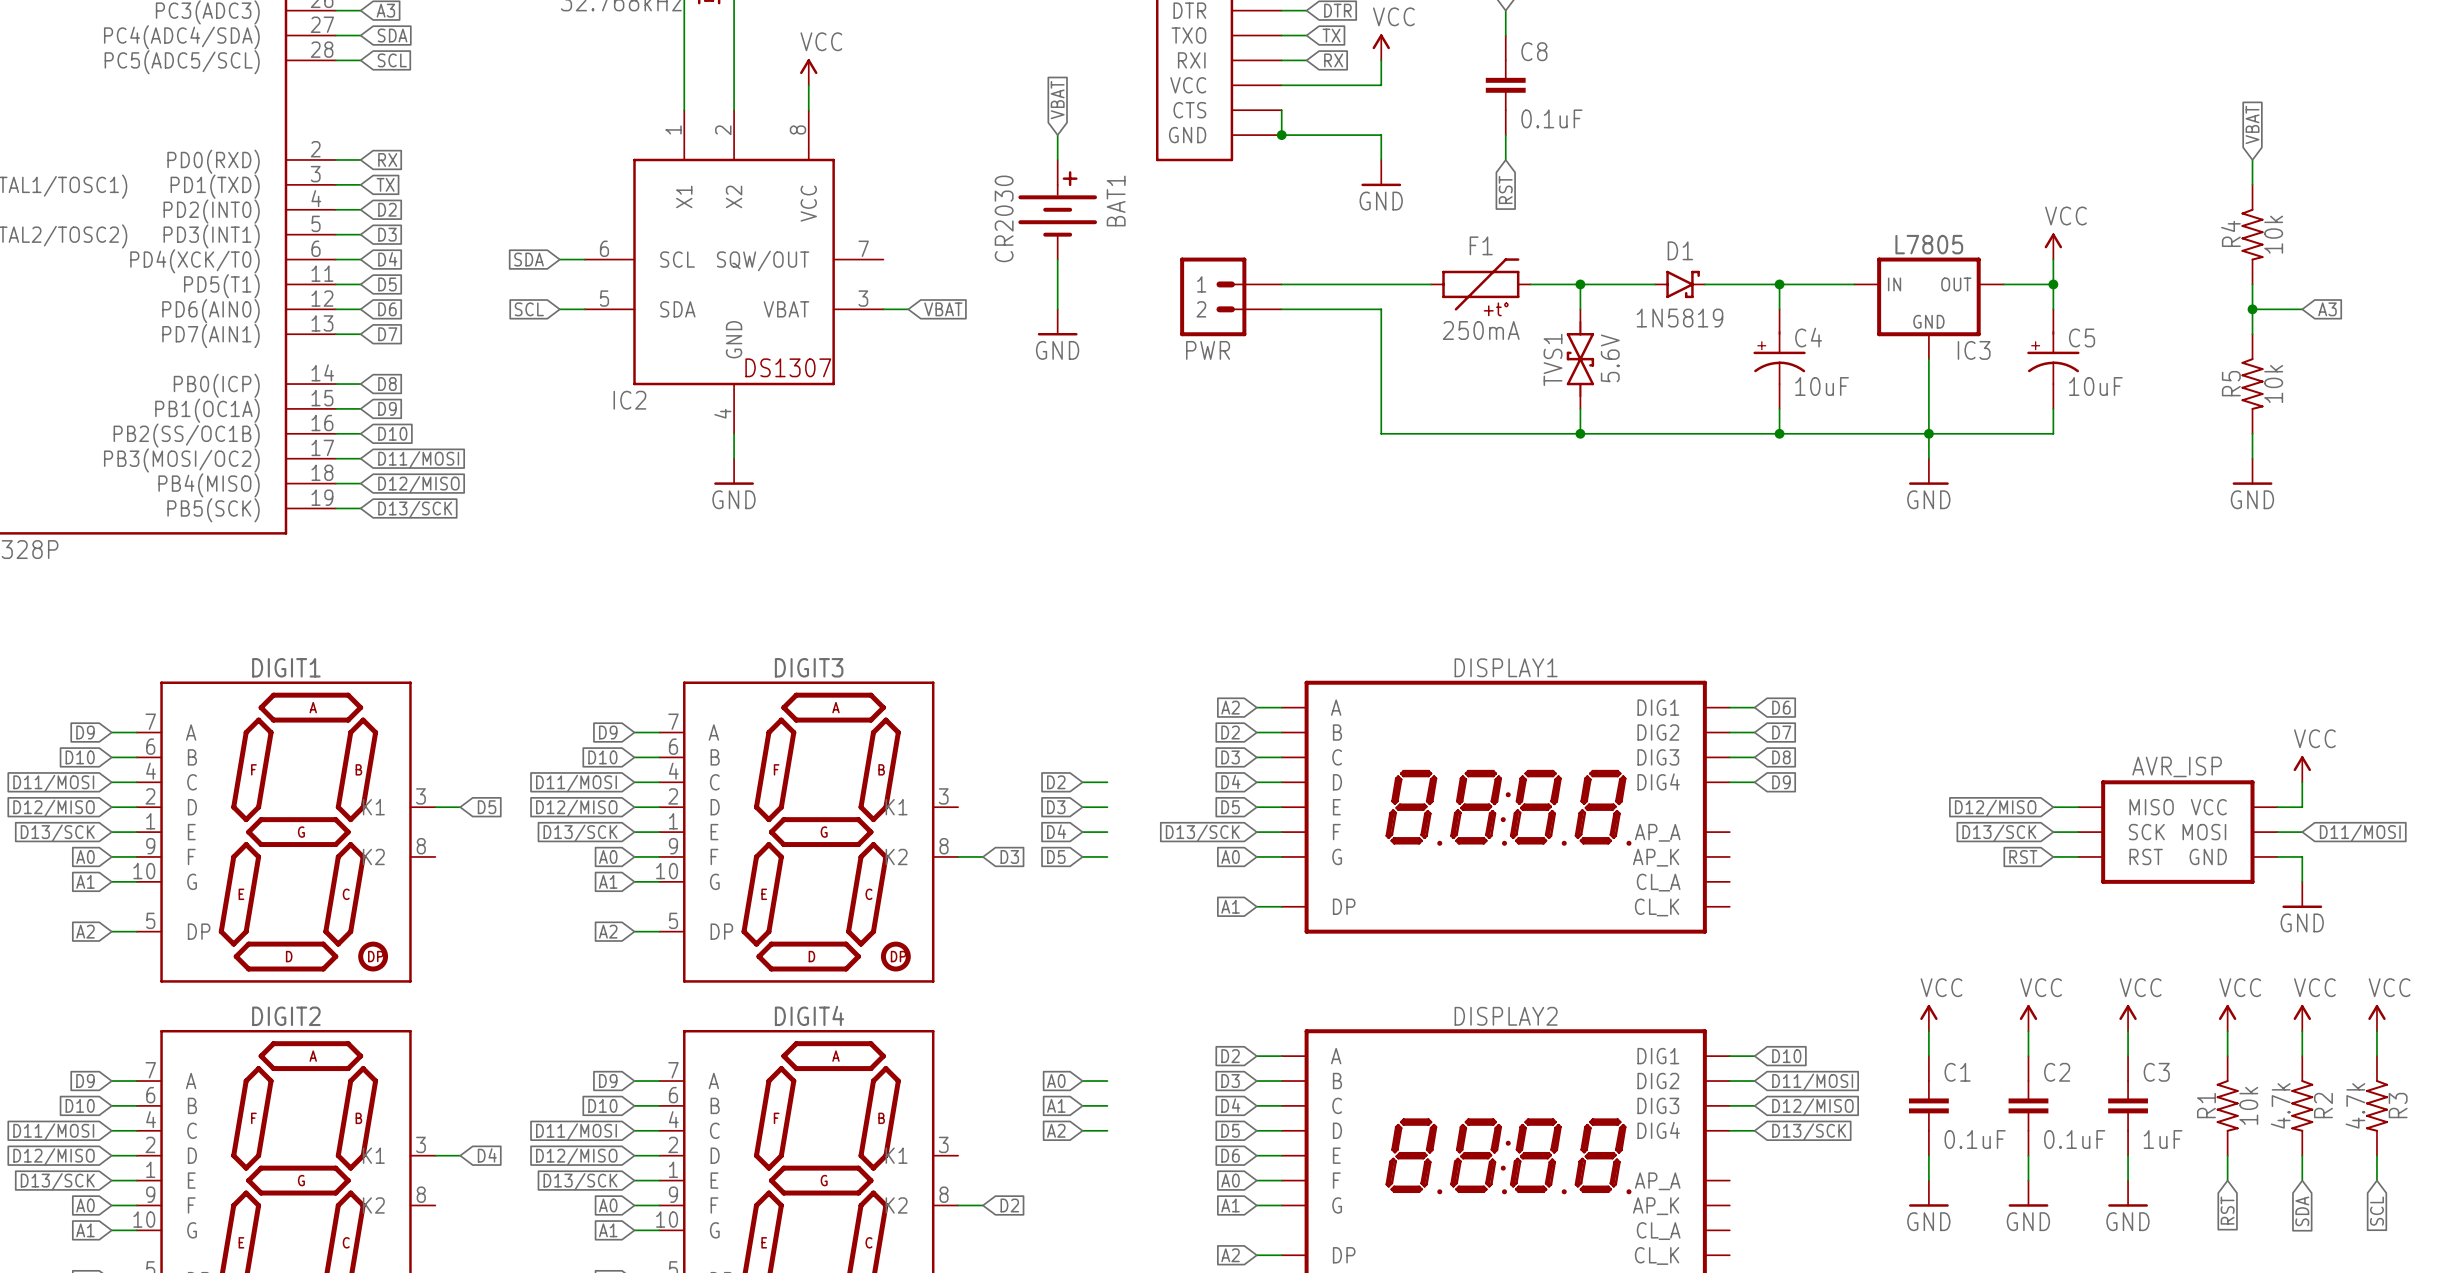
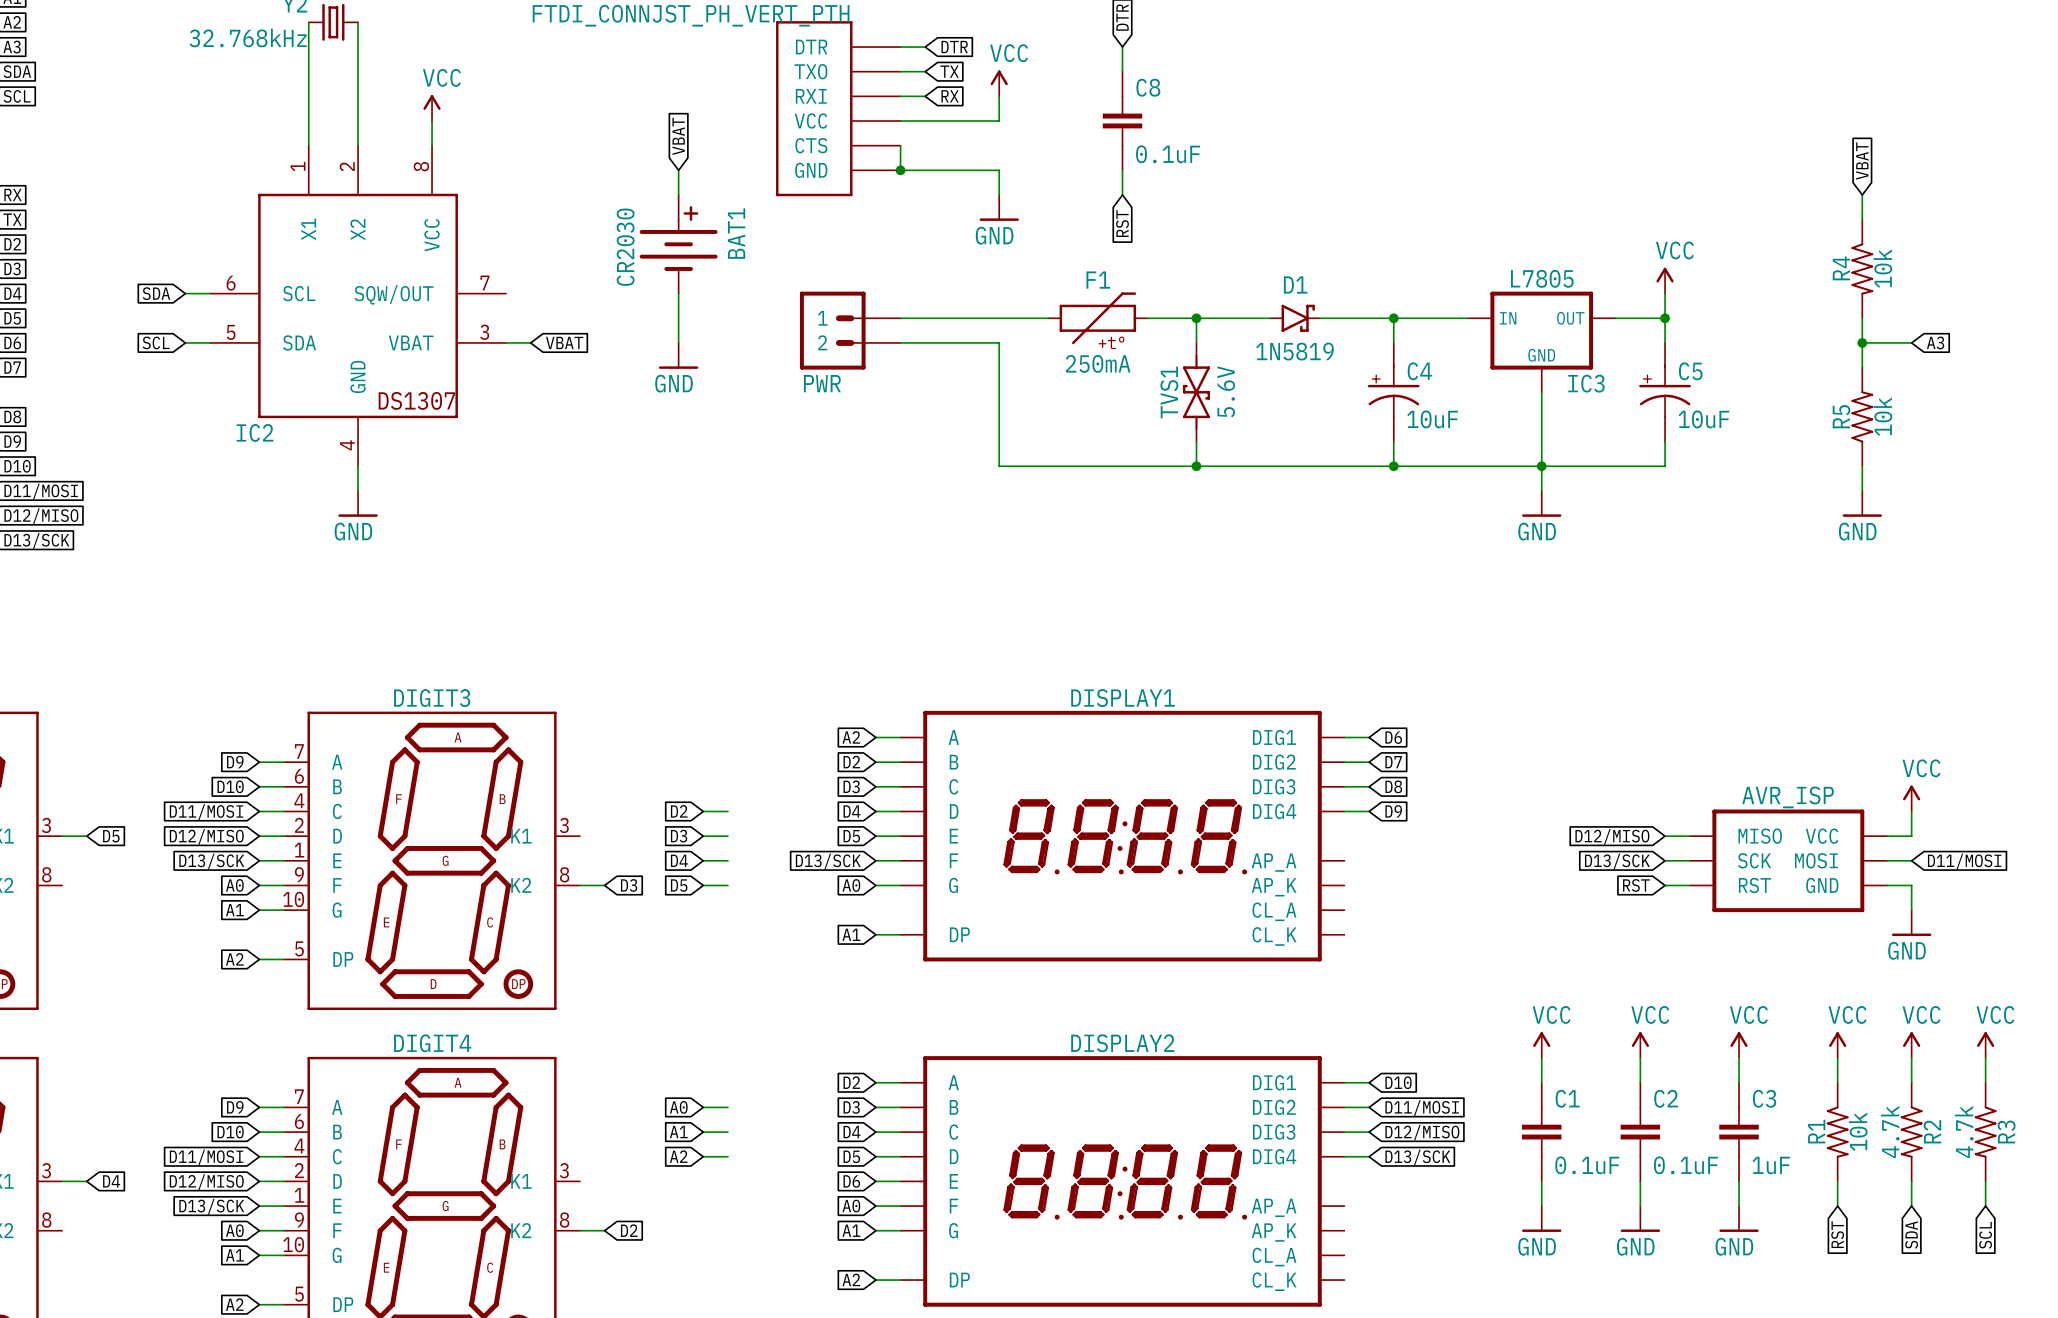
R5 flip: as is (2252, 384) -> up-down (1862, 416)

